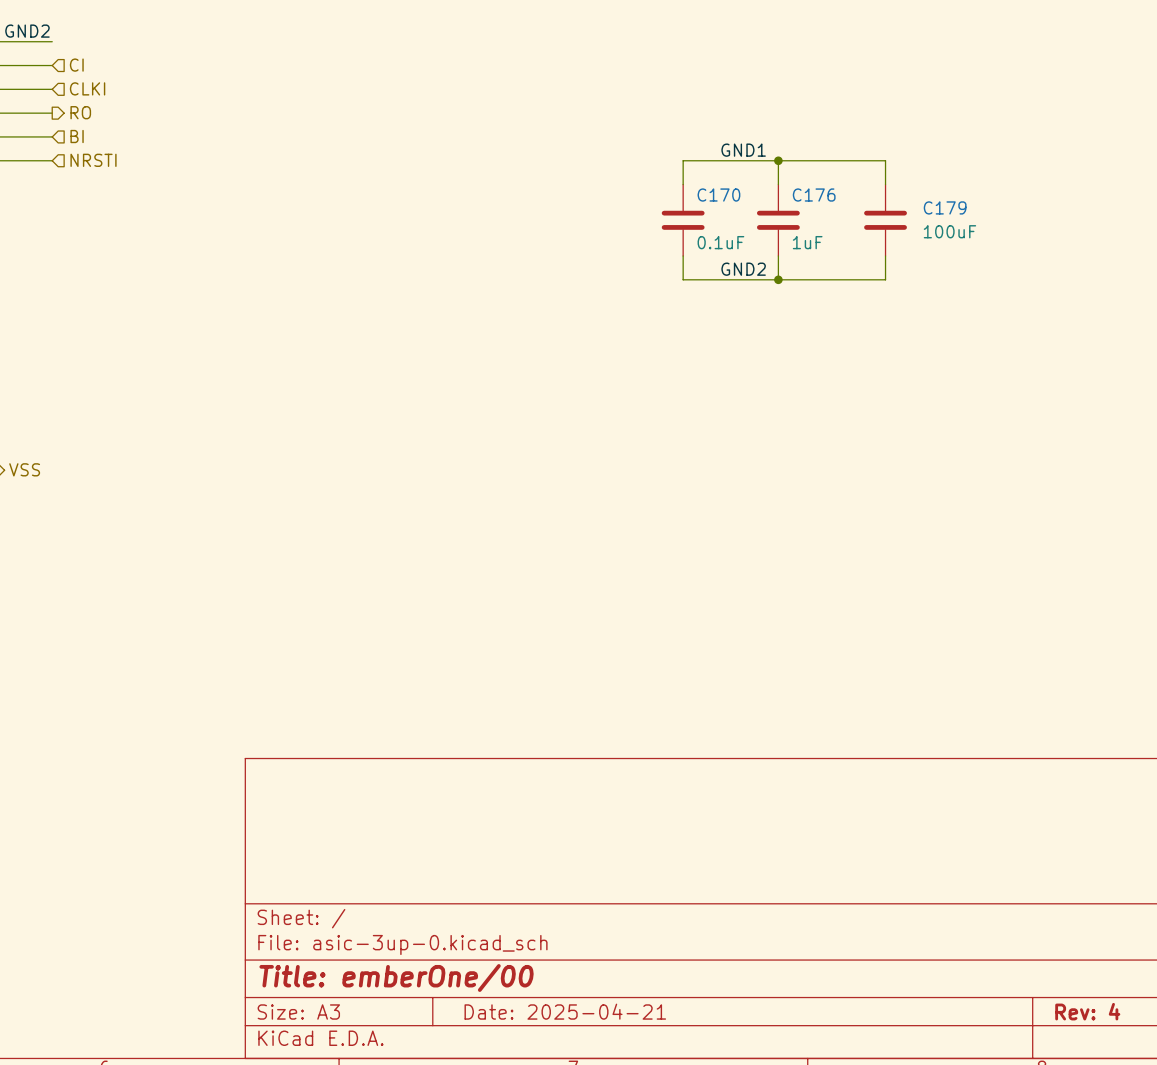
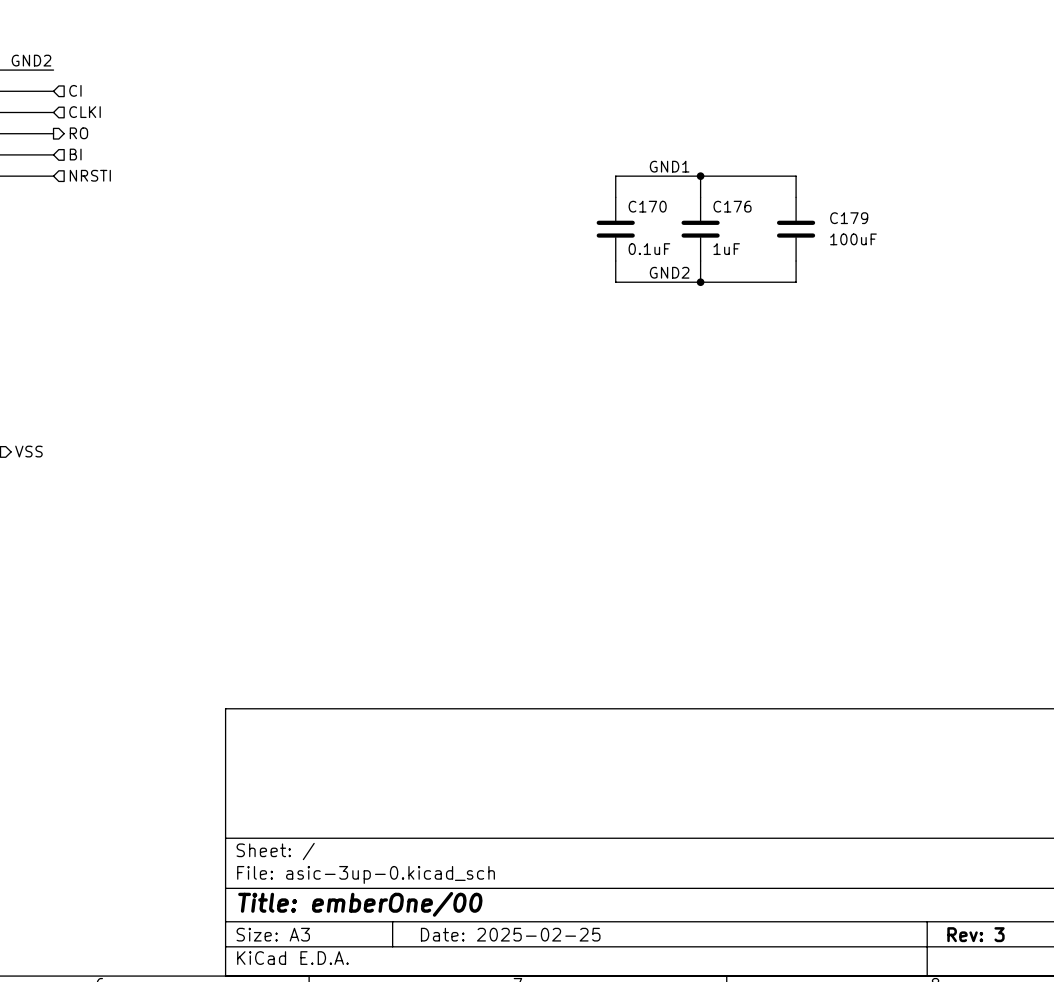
title block: Date: 2025-04-21 (565, 1011) -> Date: 2025-02-25 (510, 934)
title block: Rev: 4 (1087, 1011) -> Rev: 3 (975, 934)

